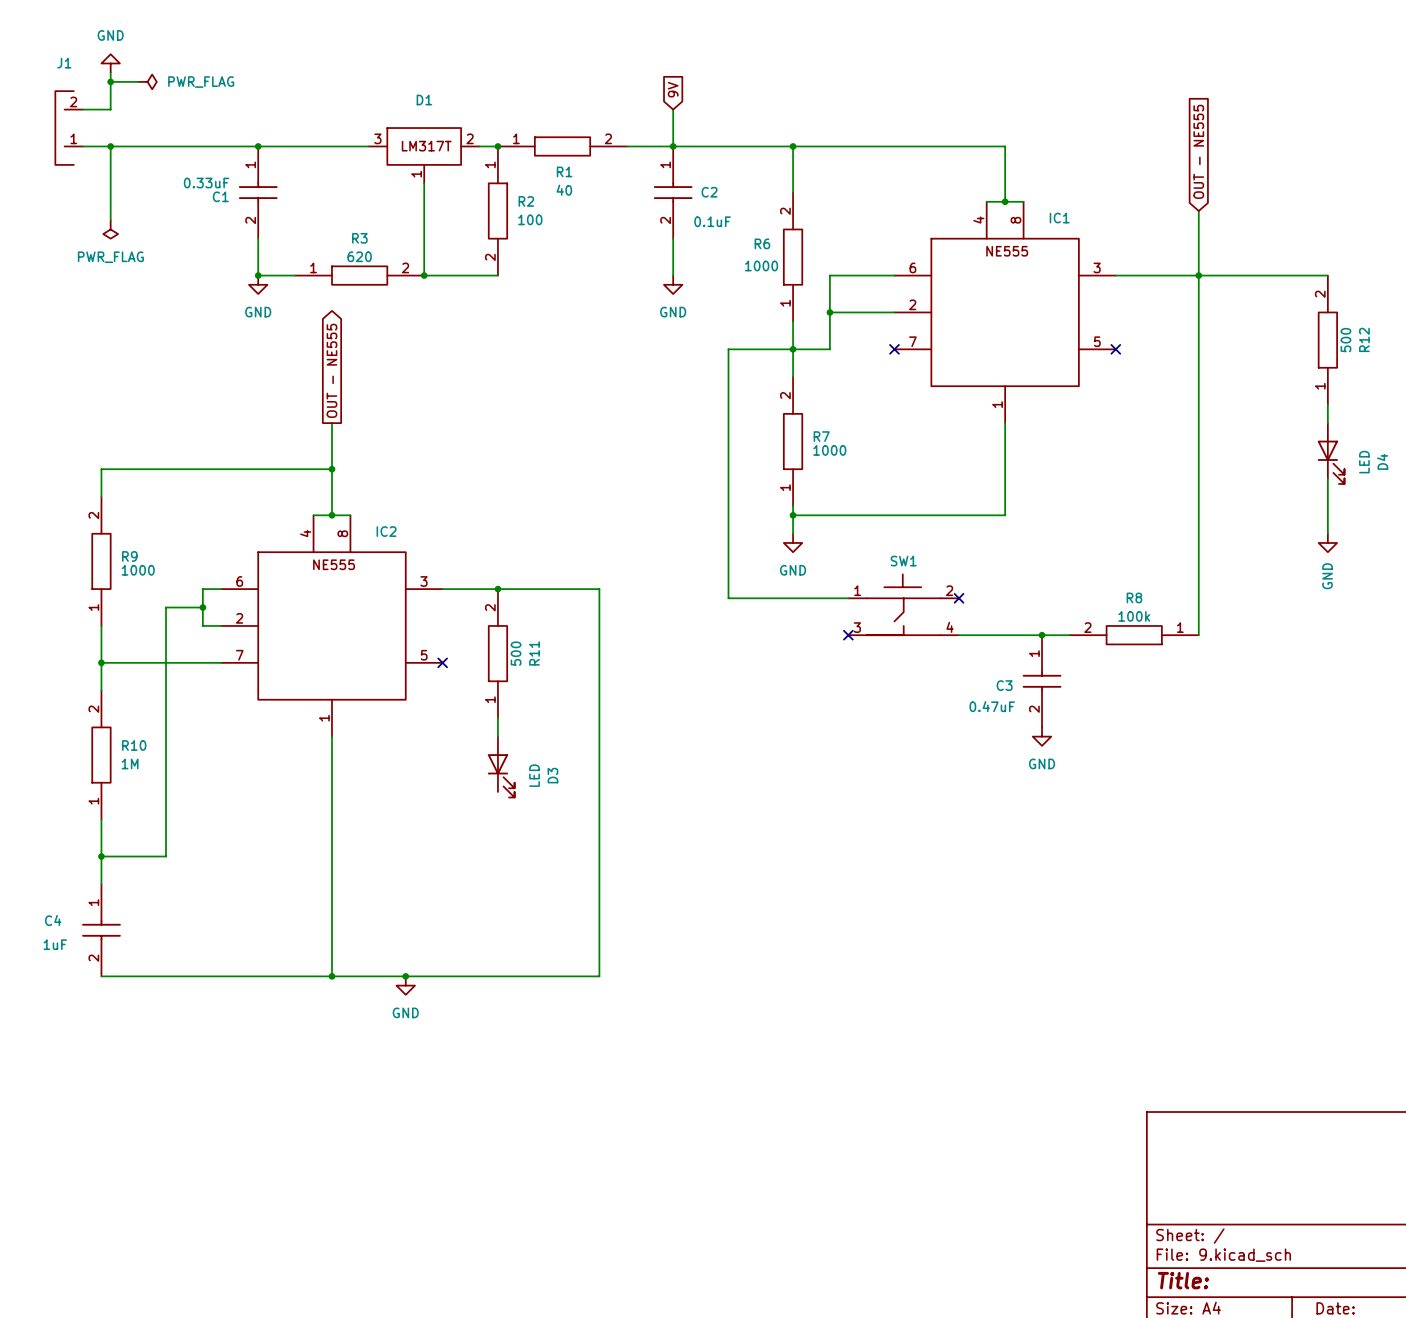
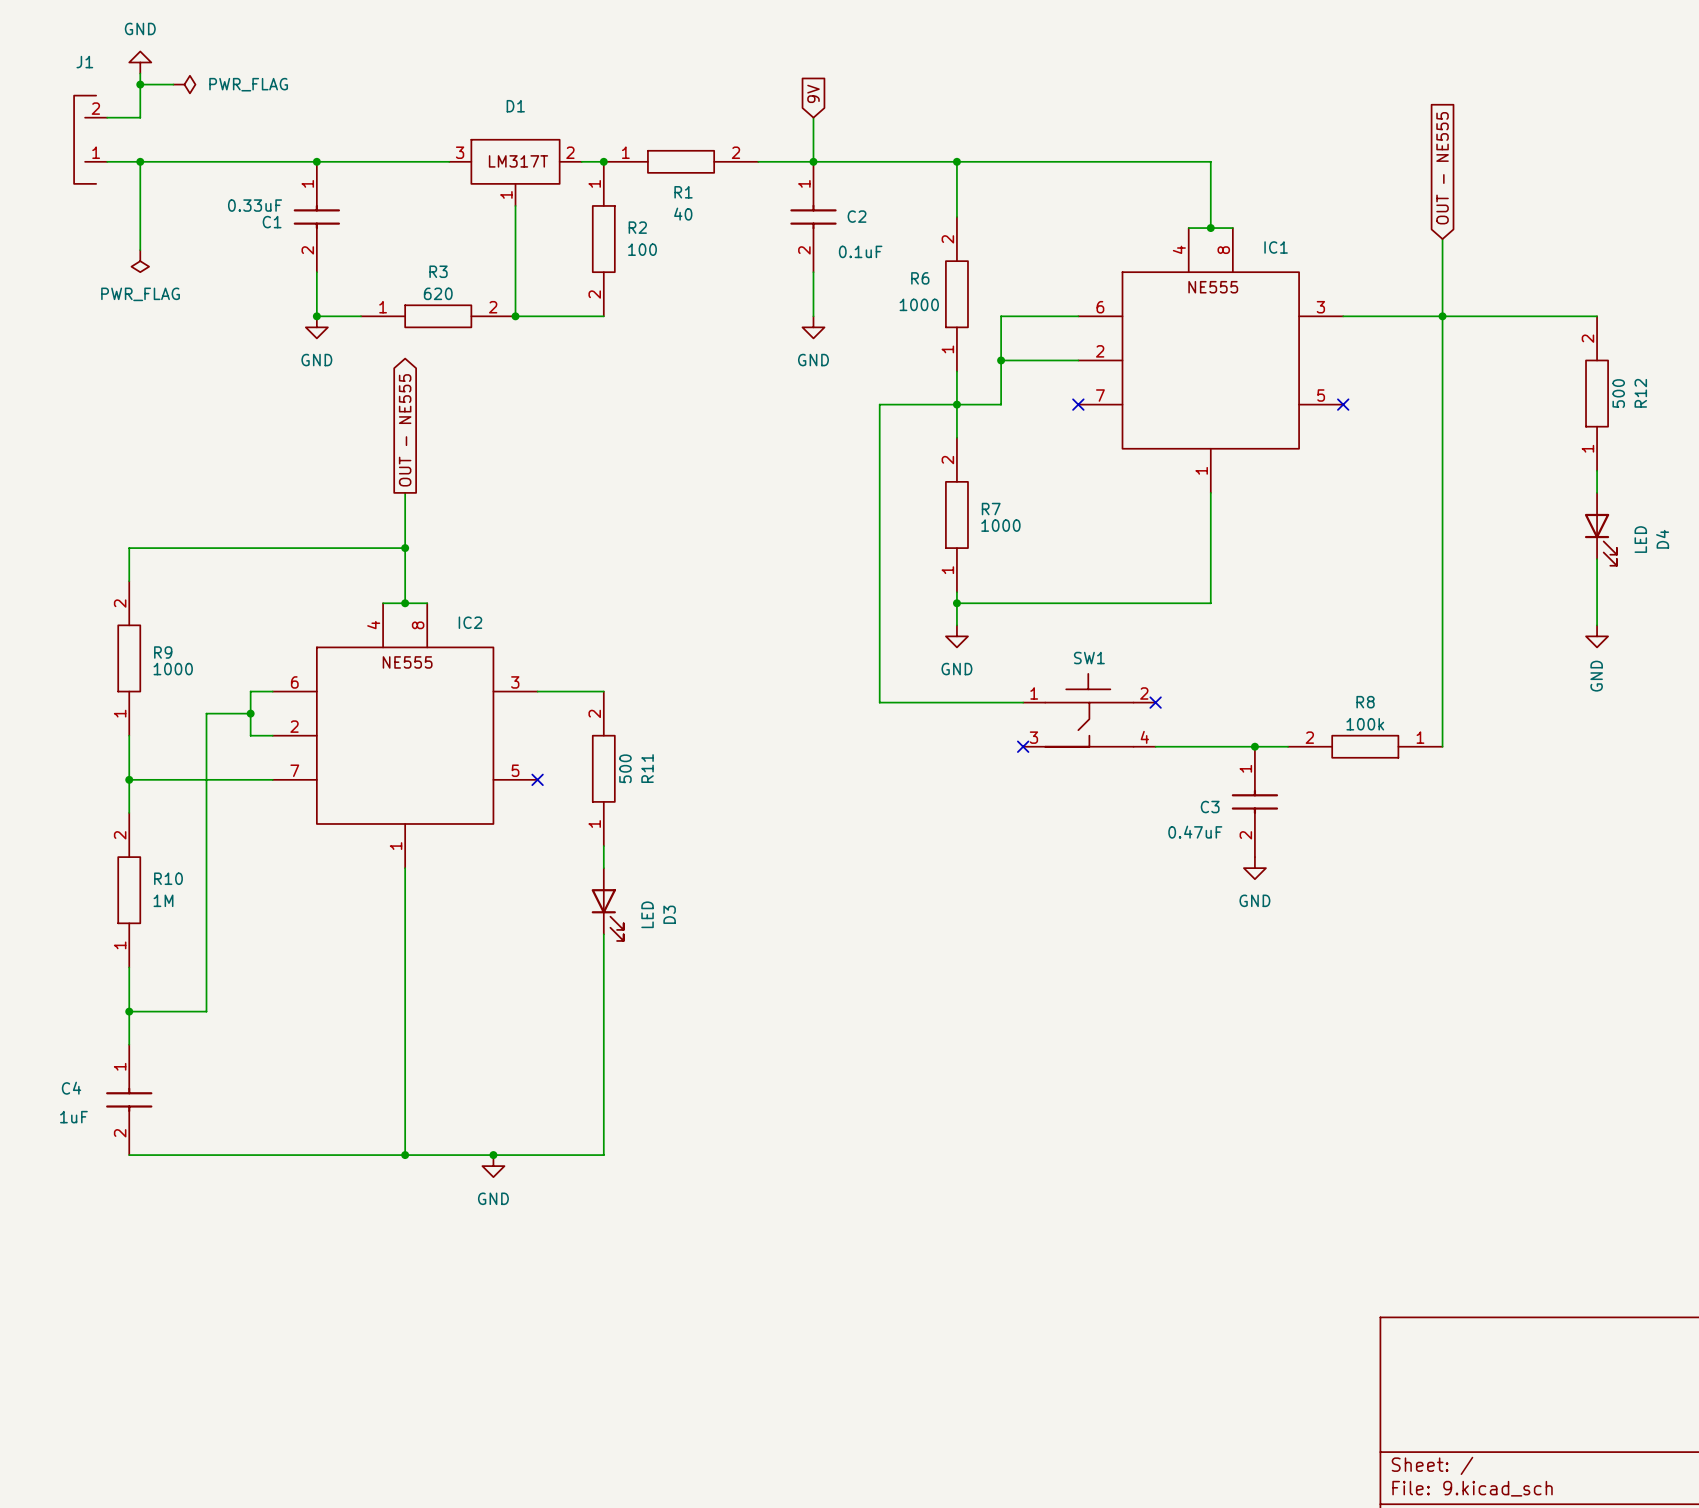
wire: (497, 589) (599, 589) (599, 976) (497, 976) -> (603, 934) (603, 1155)
junction: (497, 589) -> none

